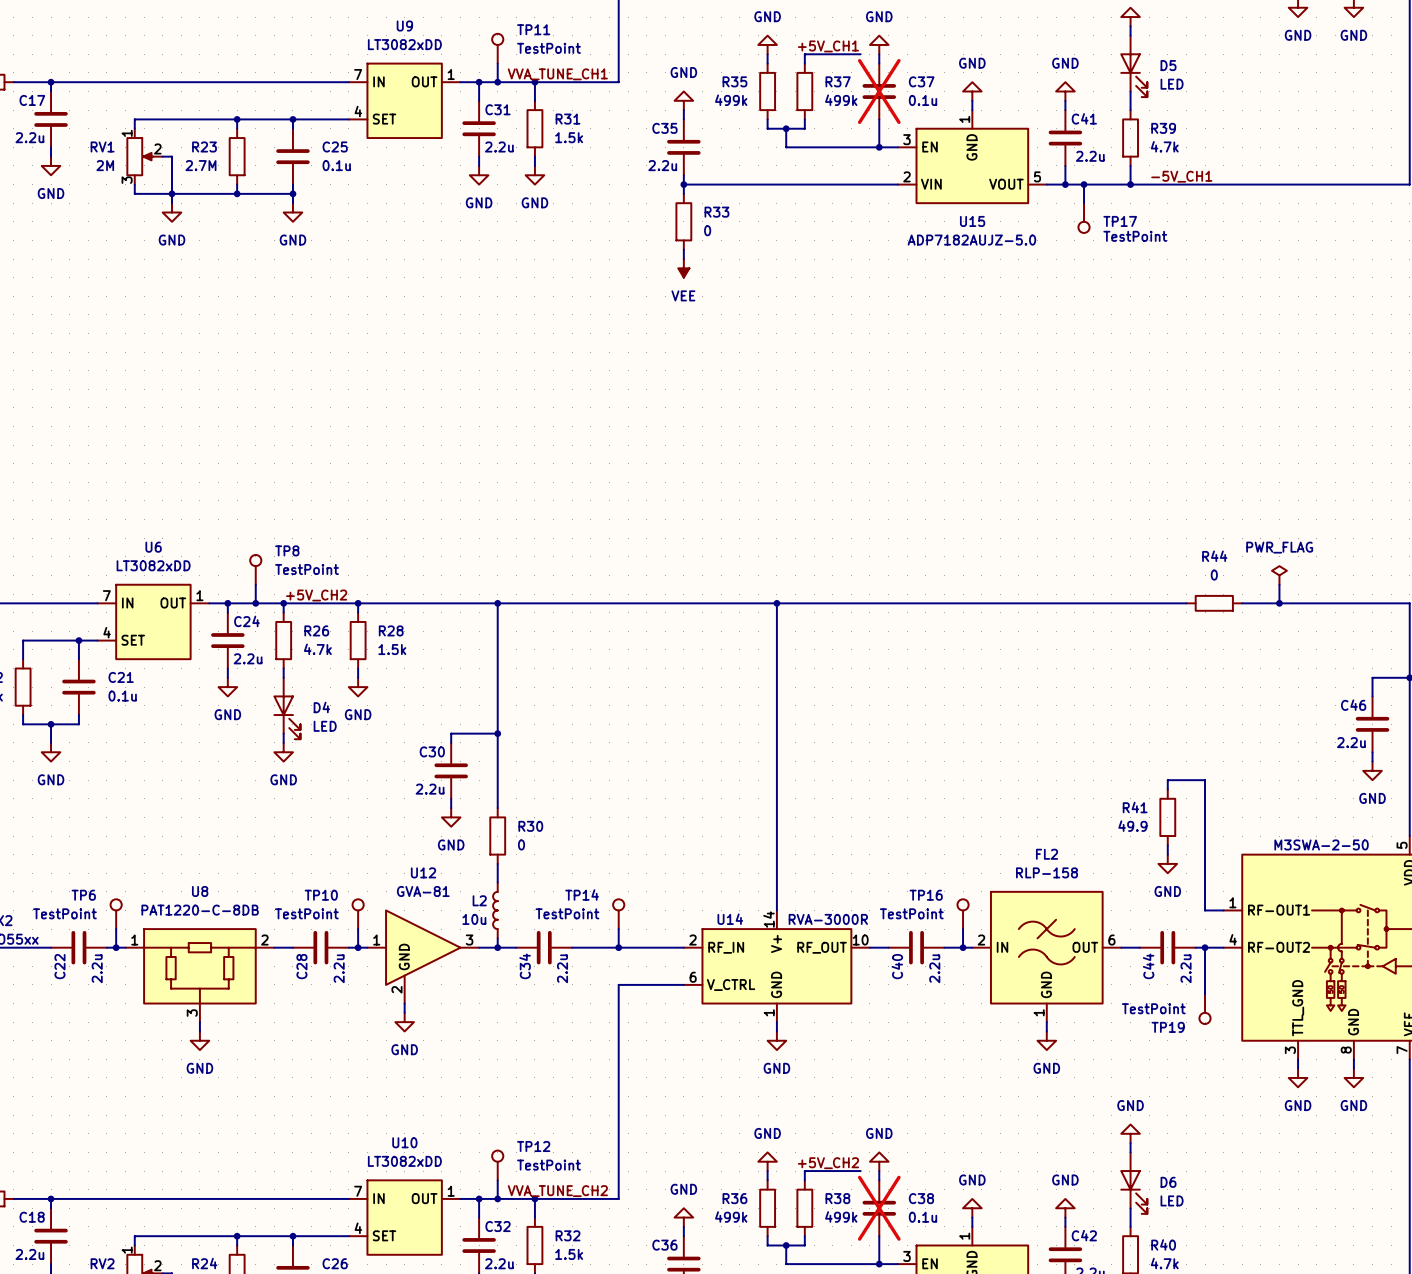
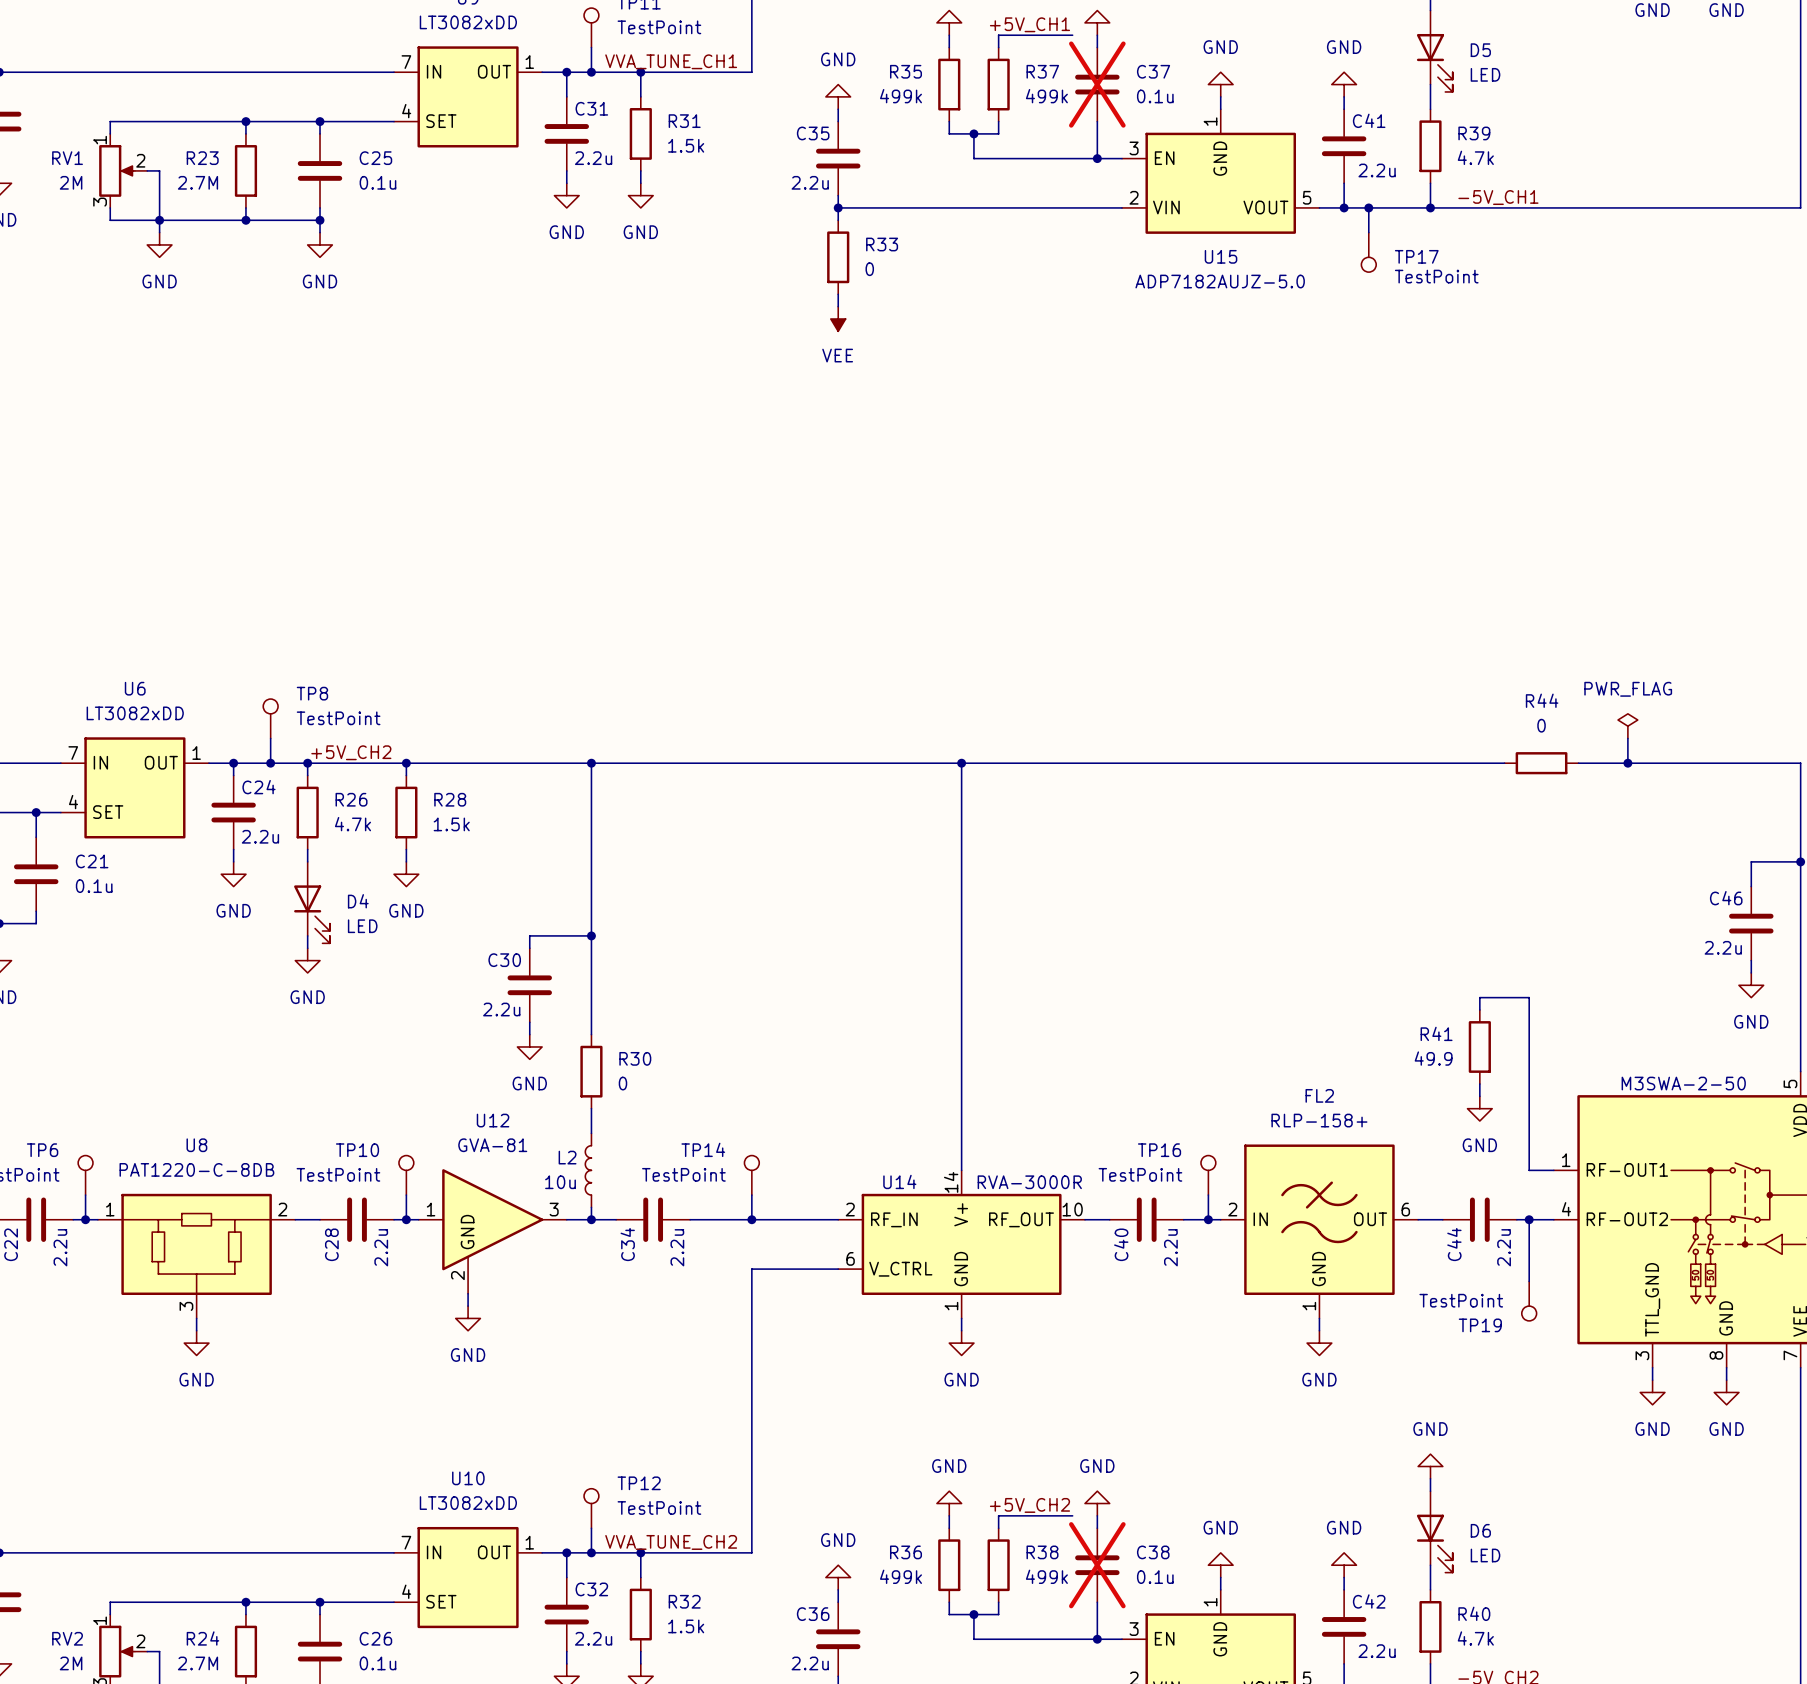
FL2 value: RLP-158 (1047, 872) -> RLP-158+ (1319, 1120)

